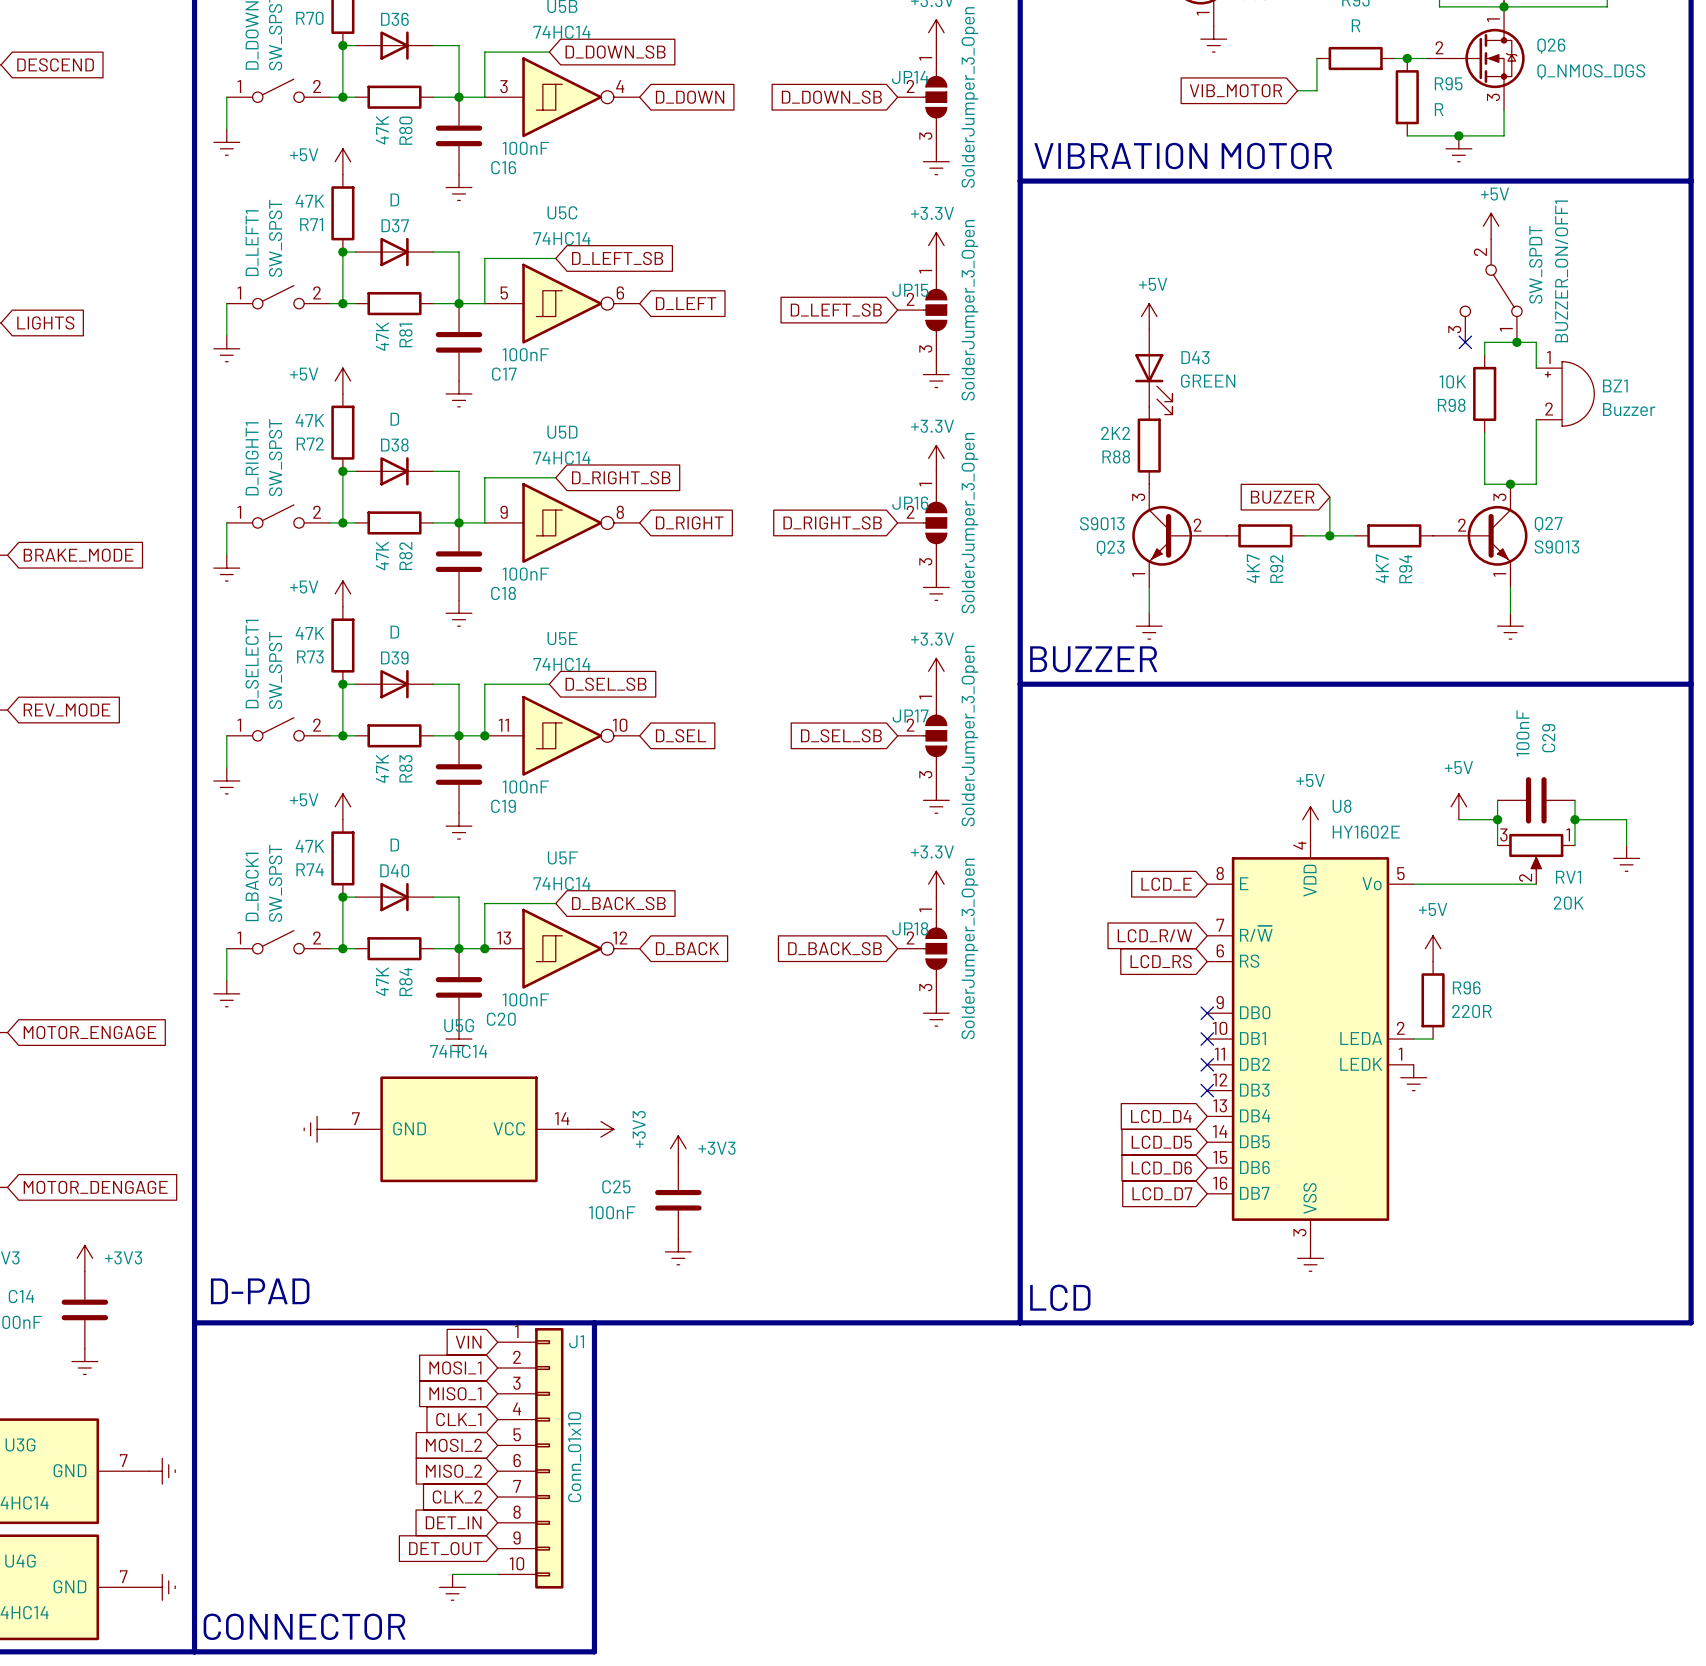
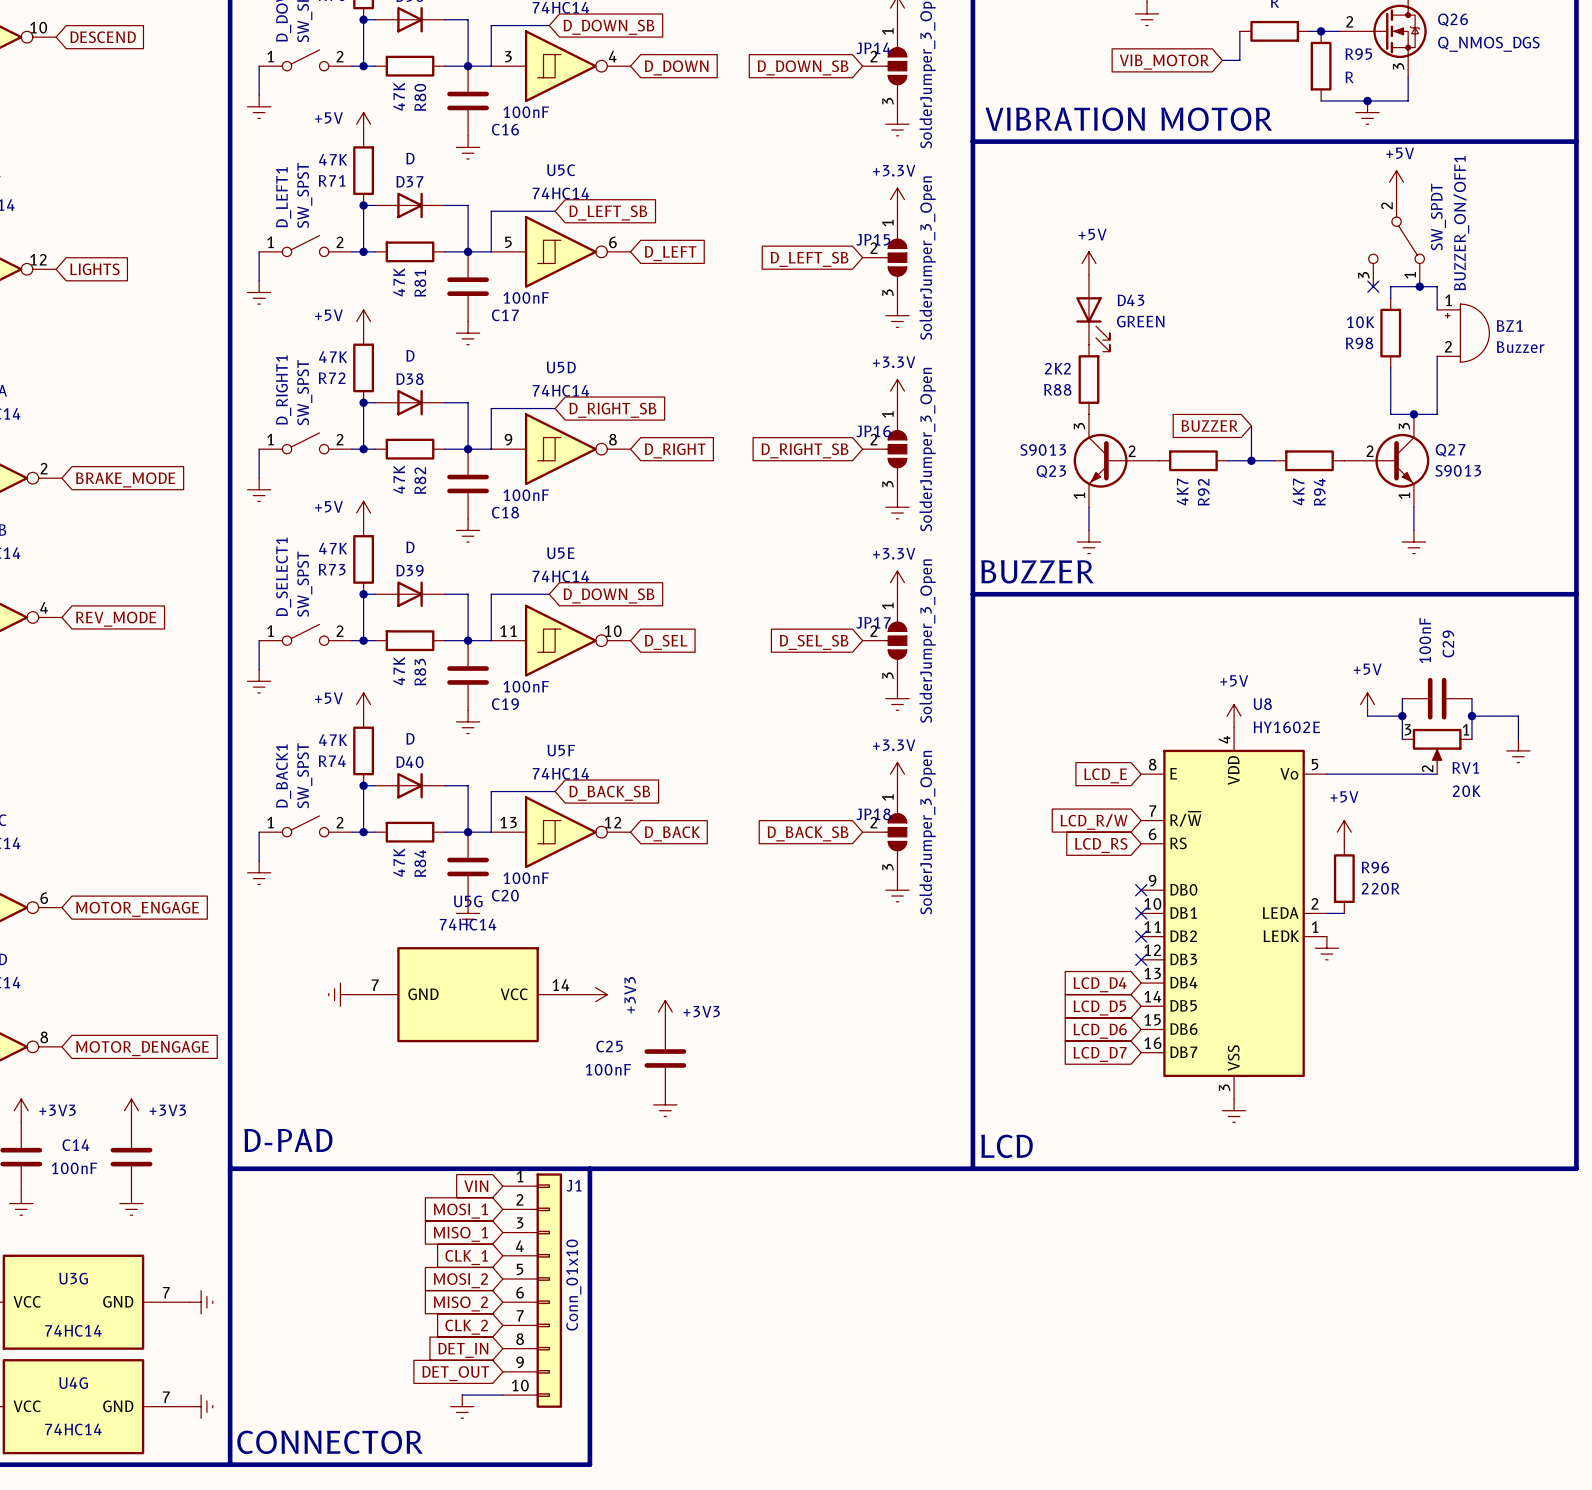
global label: D_SEL_SB (606, 684) -> D_DOWN_SB (608, 595)
junction: (484, 735) -> none
junction: (484, 948) -> none

